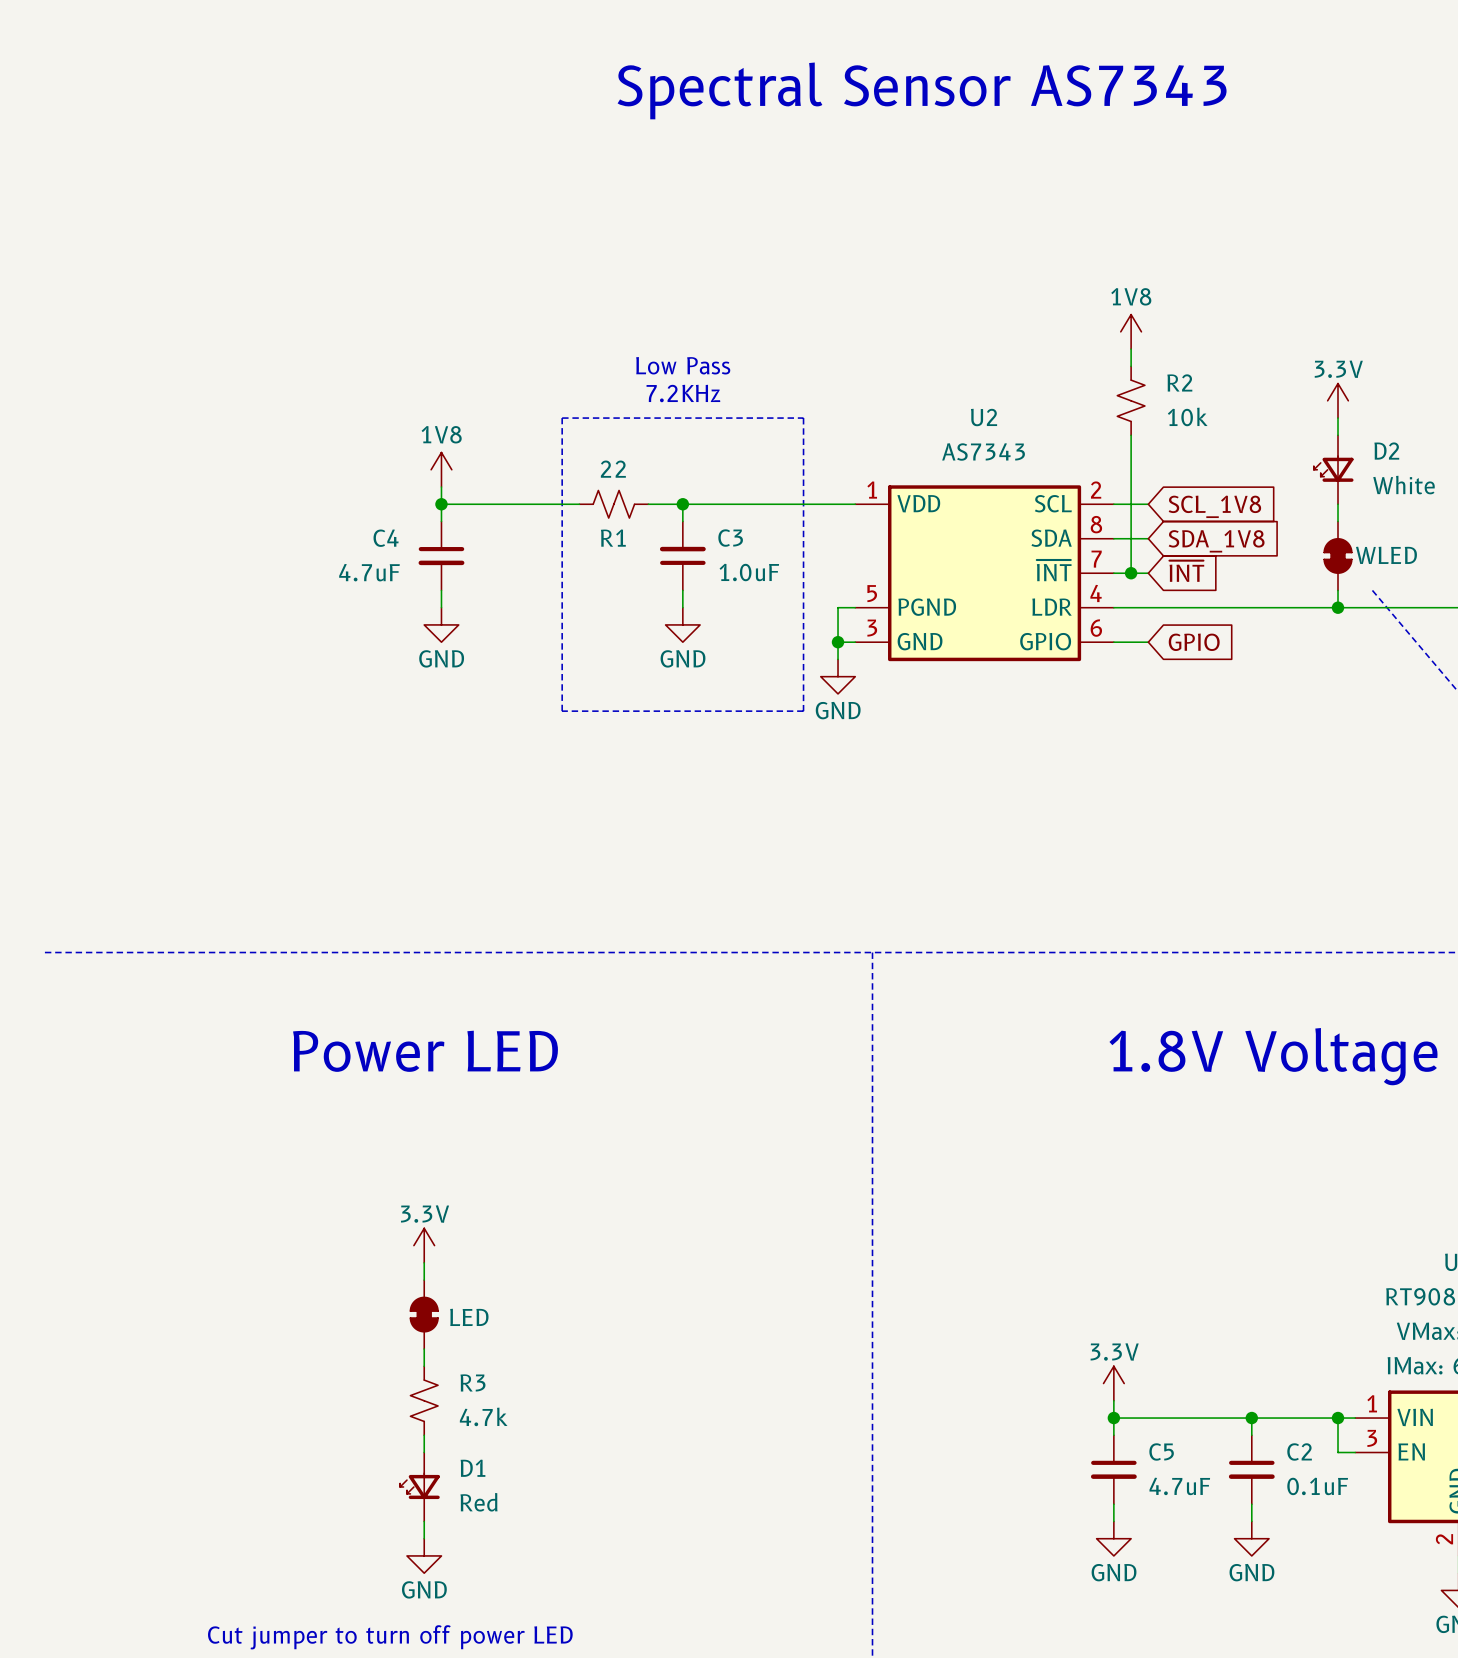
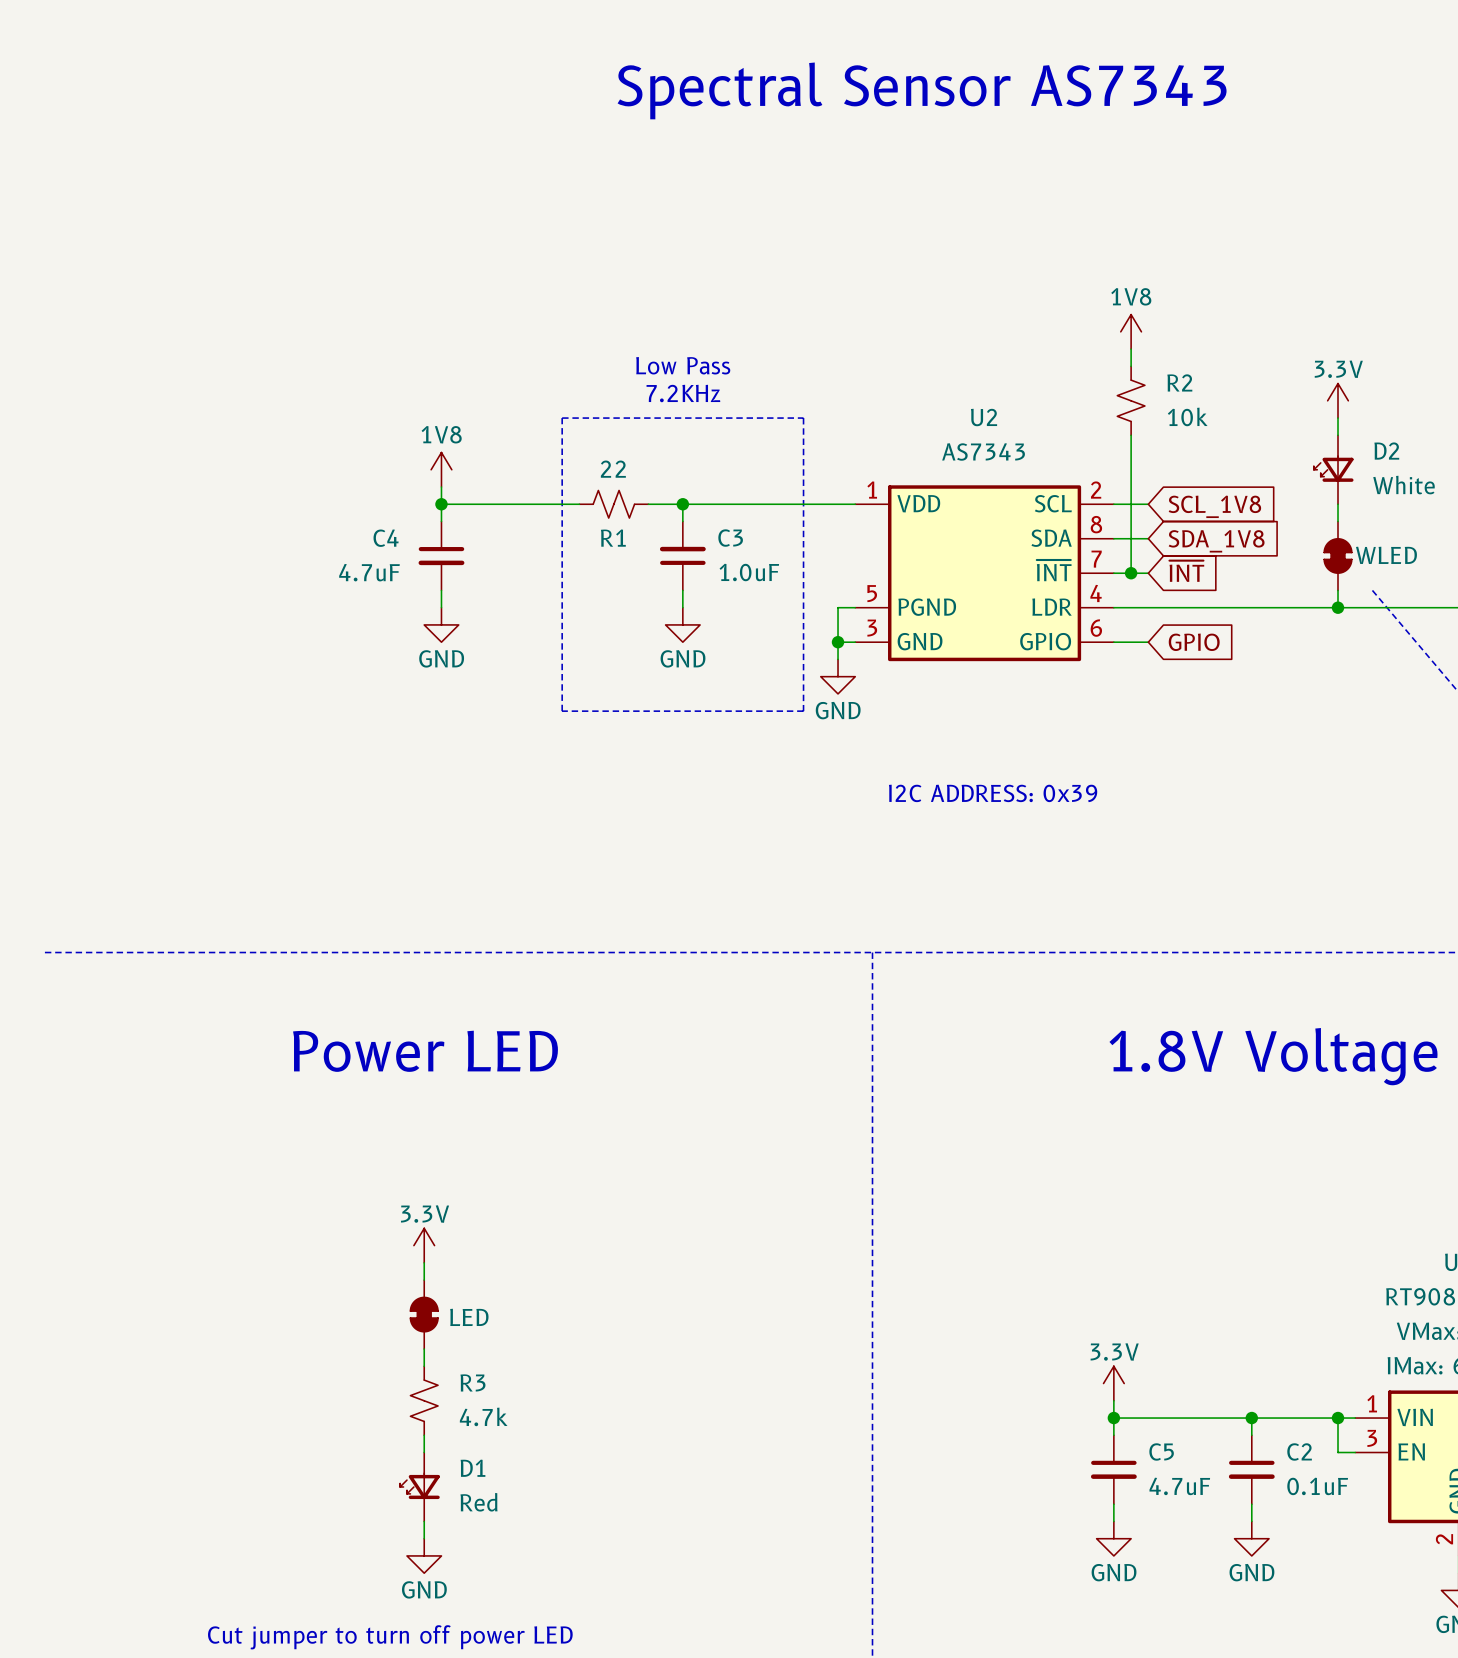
text: none -> I2C ADDRESS: 0x39 (993, 793)

